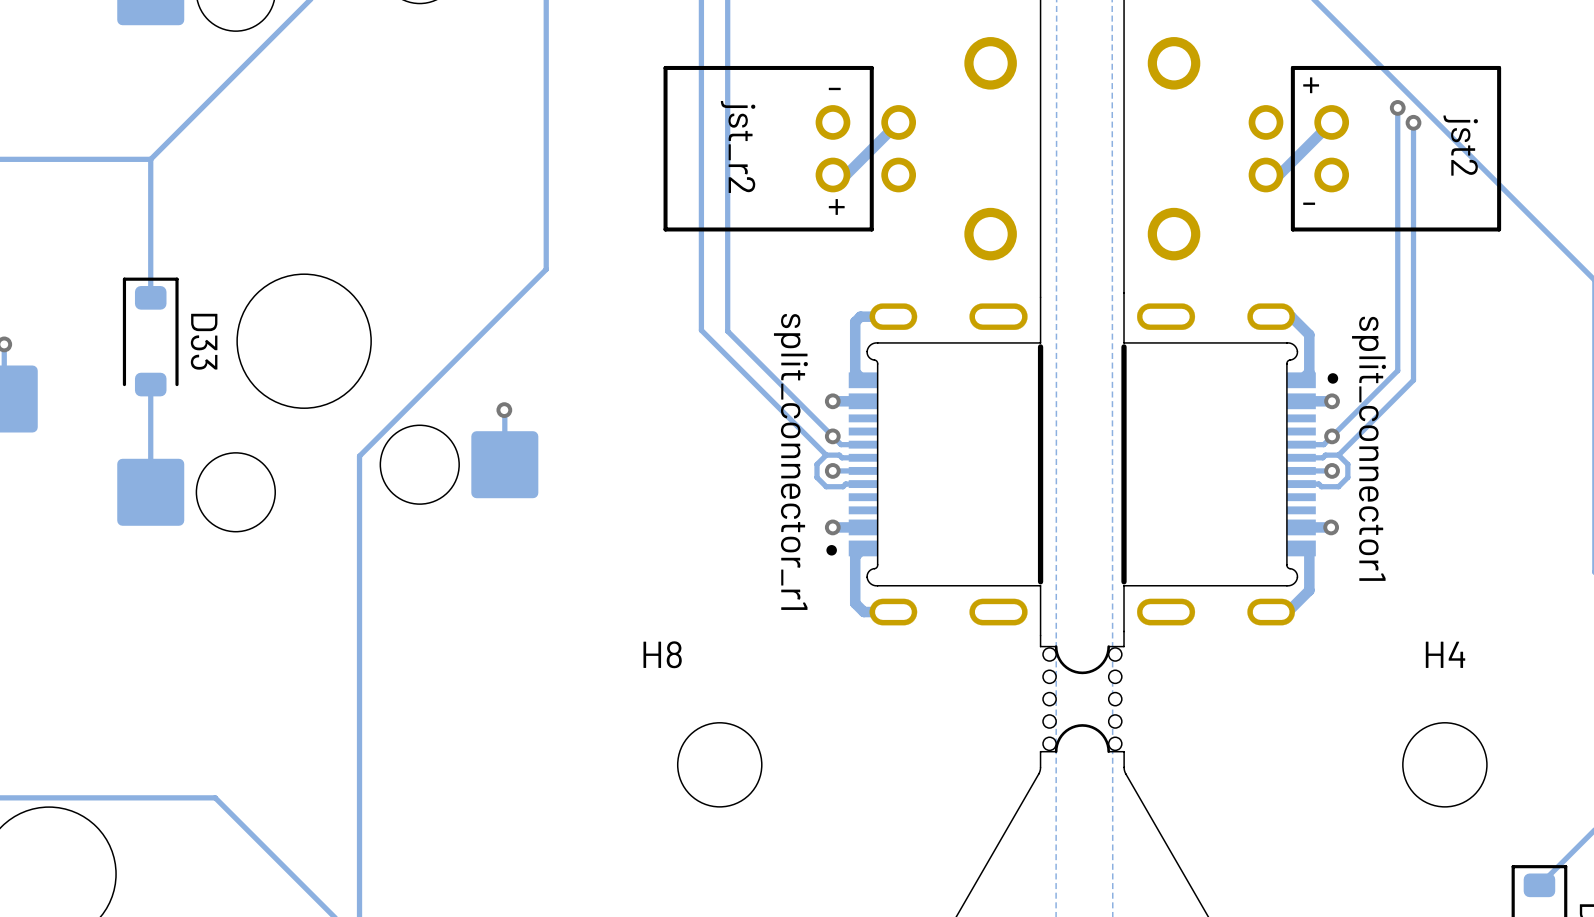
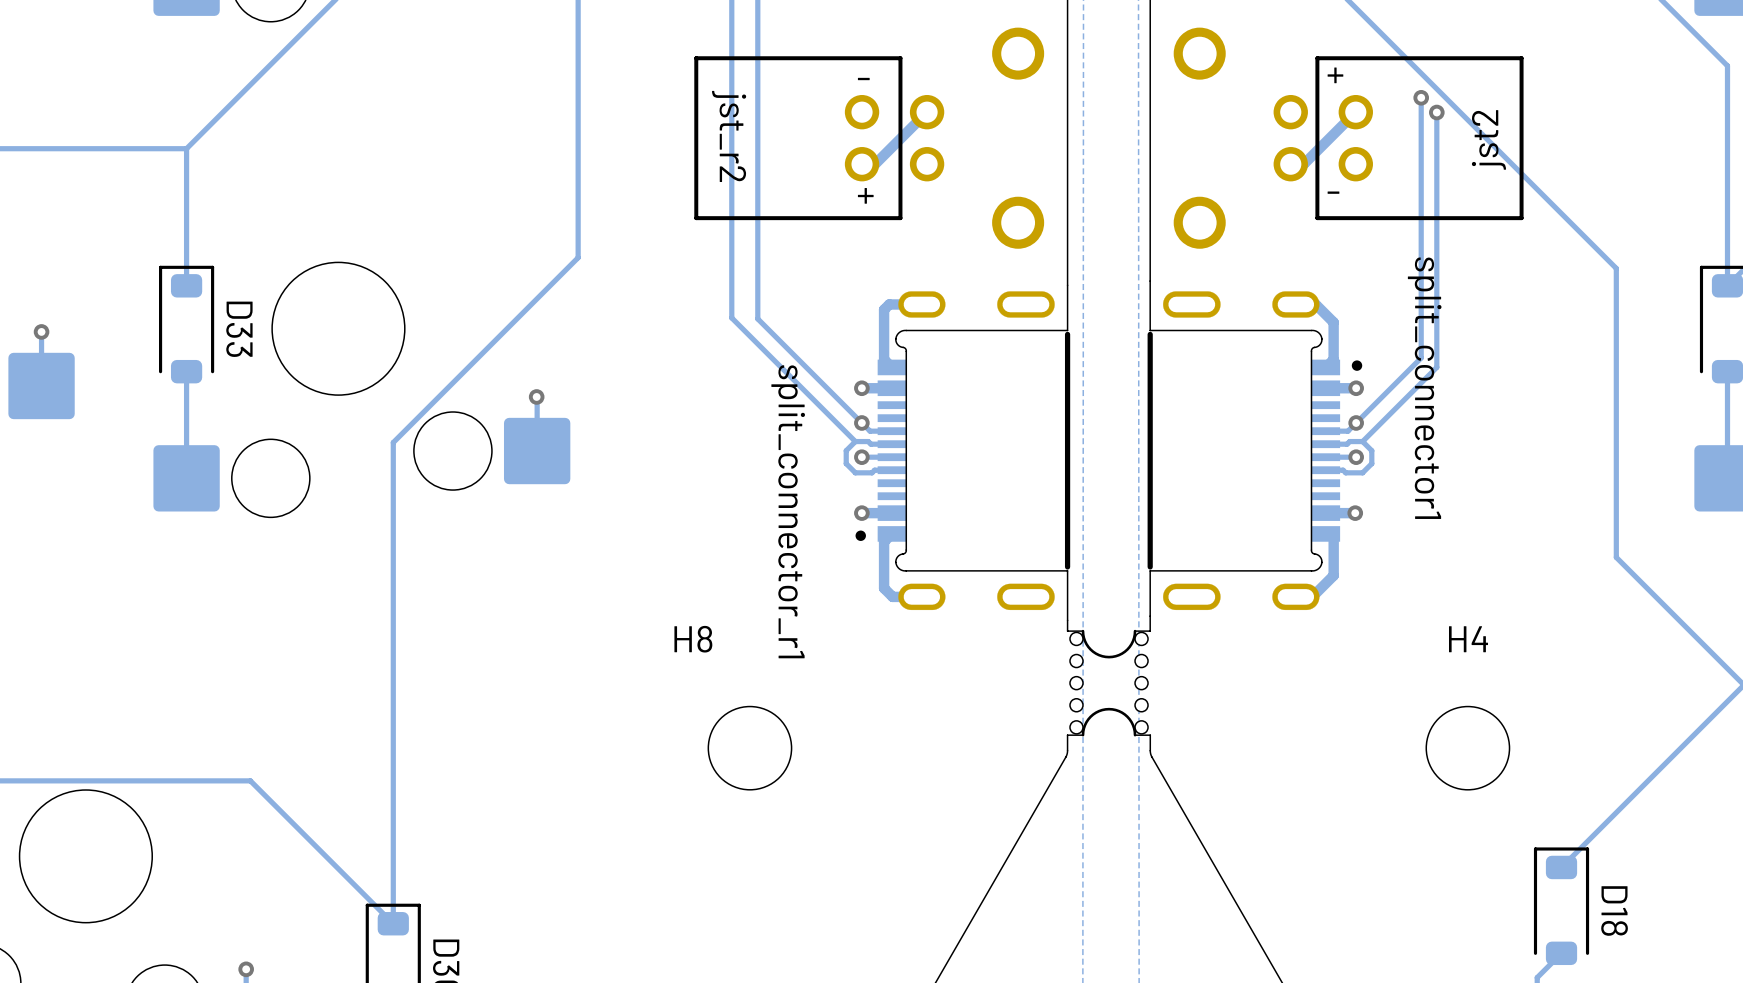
jst2 name rotation: 0° (1460, 145) -> 180° (1488, 139)
jst_r2 name position: jst_r2 (738, 146) -> jst_r2 (729, 136)
split_connector1 name position: split_connector1 (1368, 448) -> split_connector1 (1424, 388)
split_connector_r1 name position: split_connector_r1 (790, 461) -> split_connector_r1 (788, 511)

